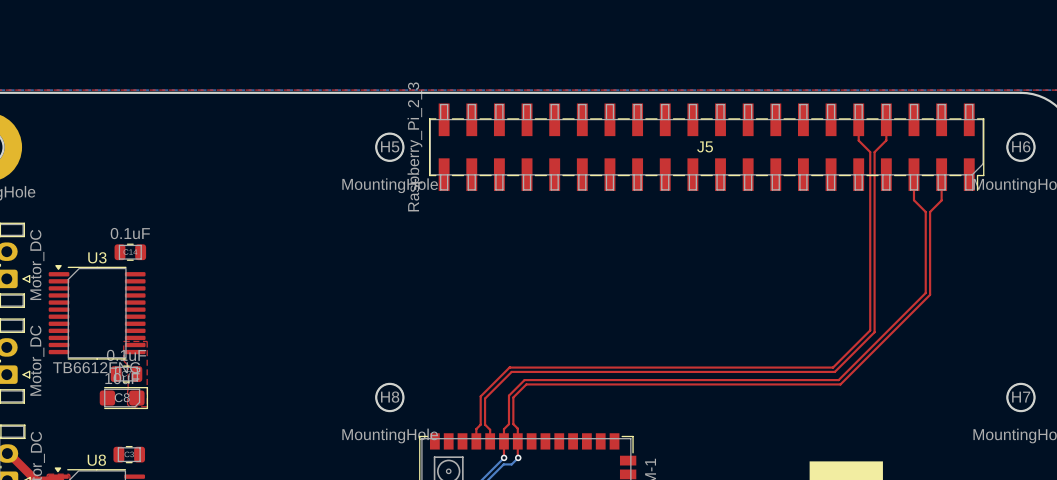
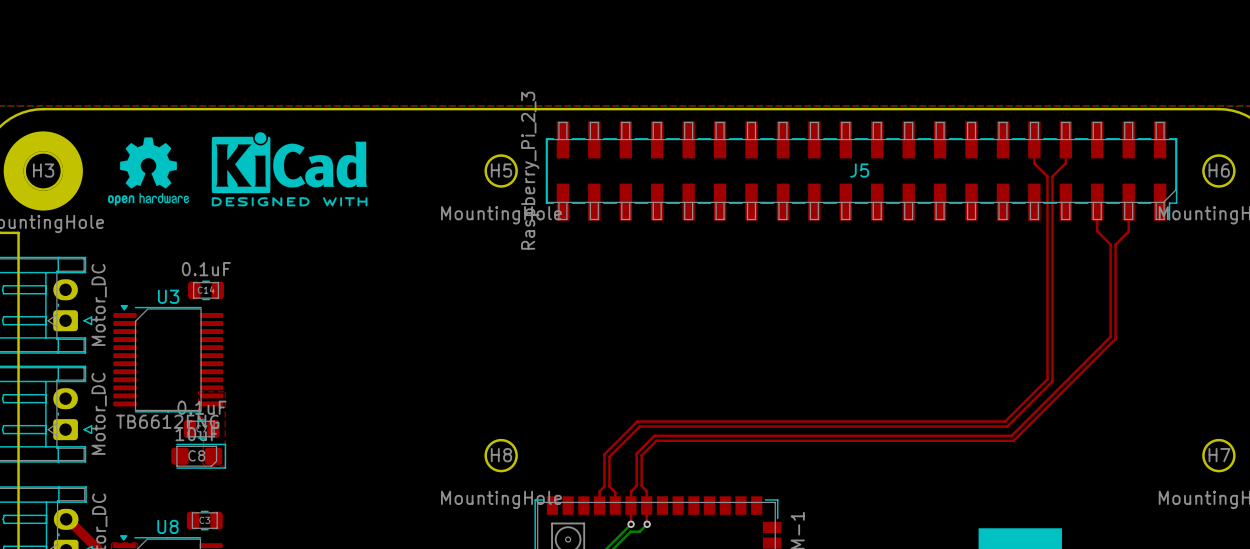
drawing: none -> [211, 132, 368, 207]
drawing: none -> [108, 137, 189, 206]

